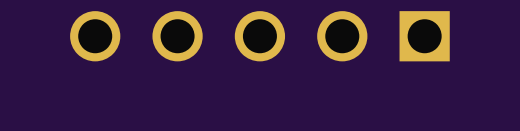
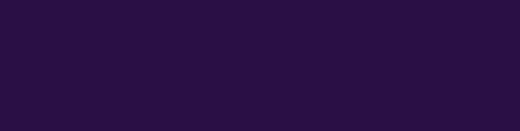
part: (259, 36) -> none

